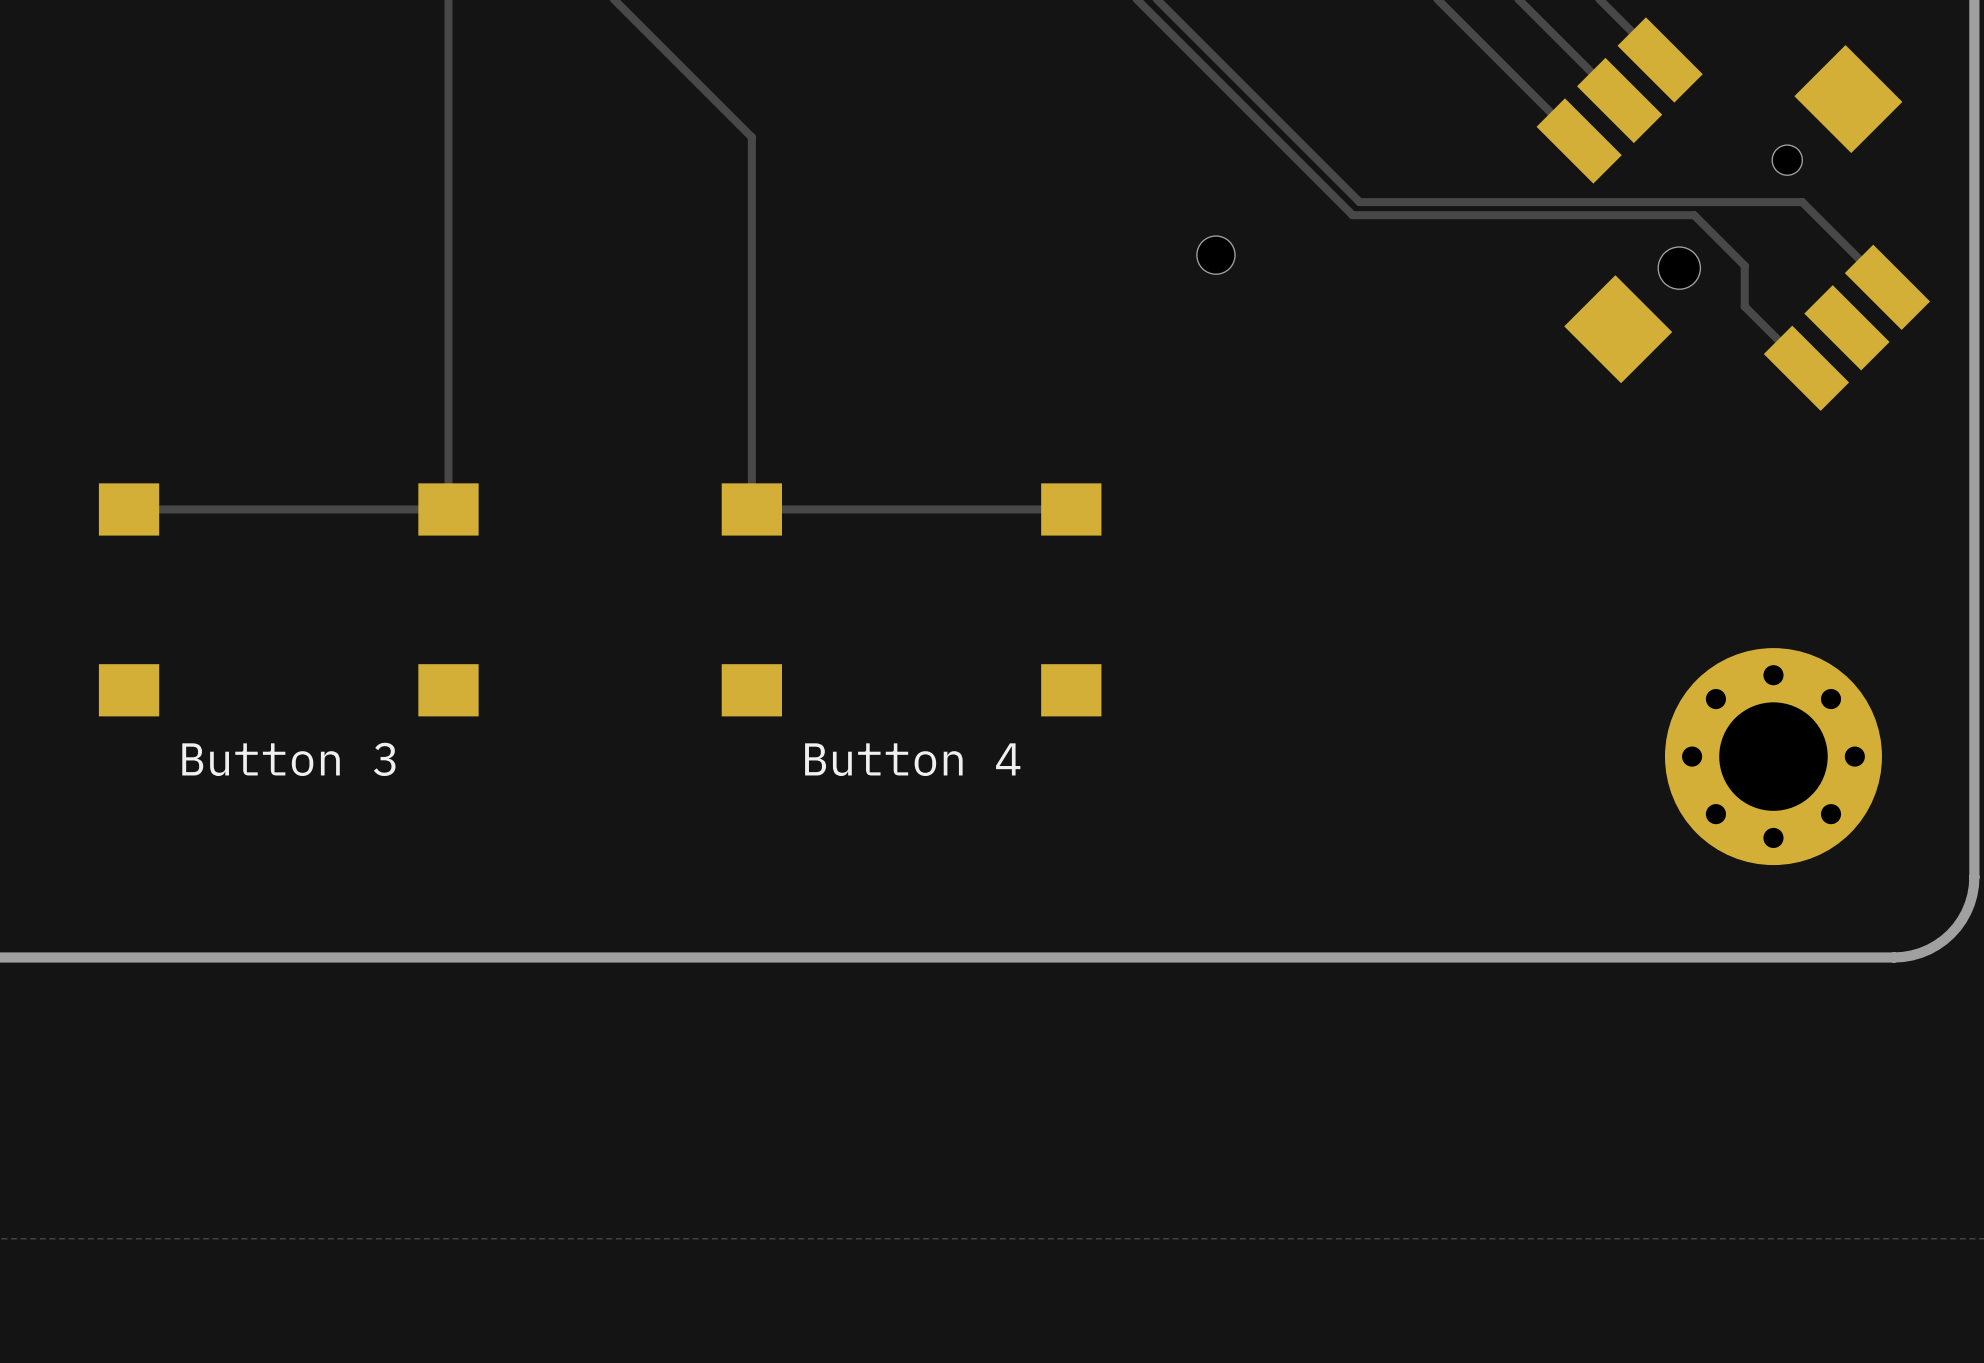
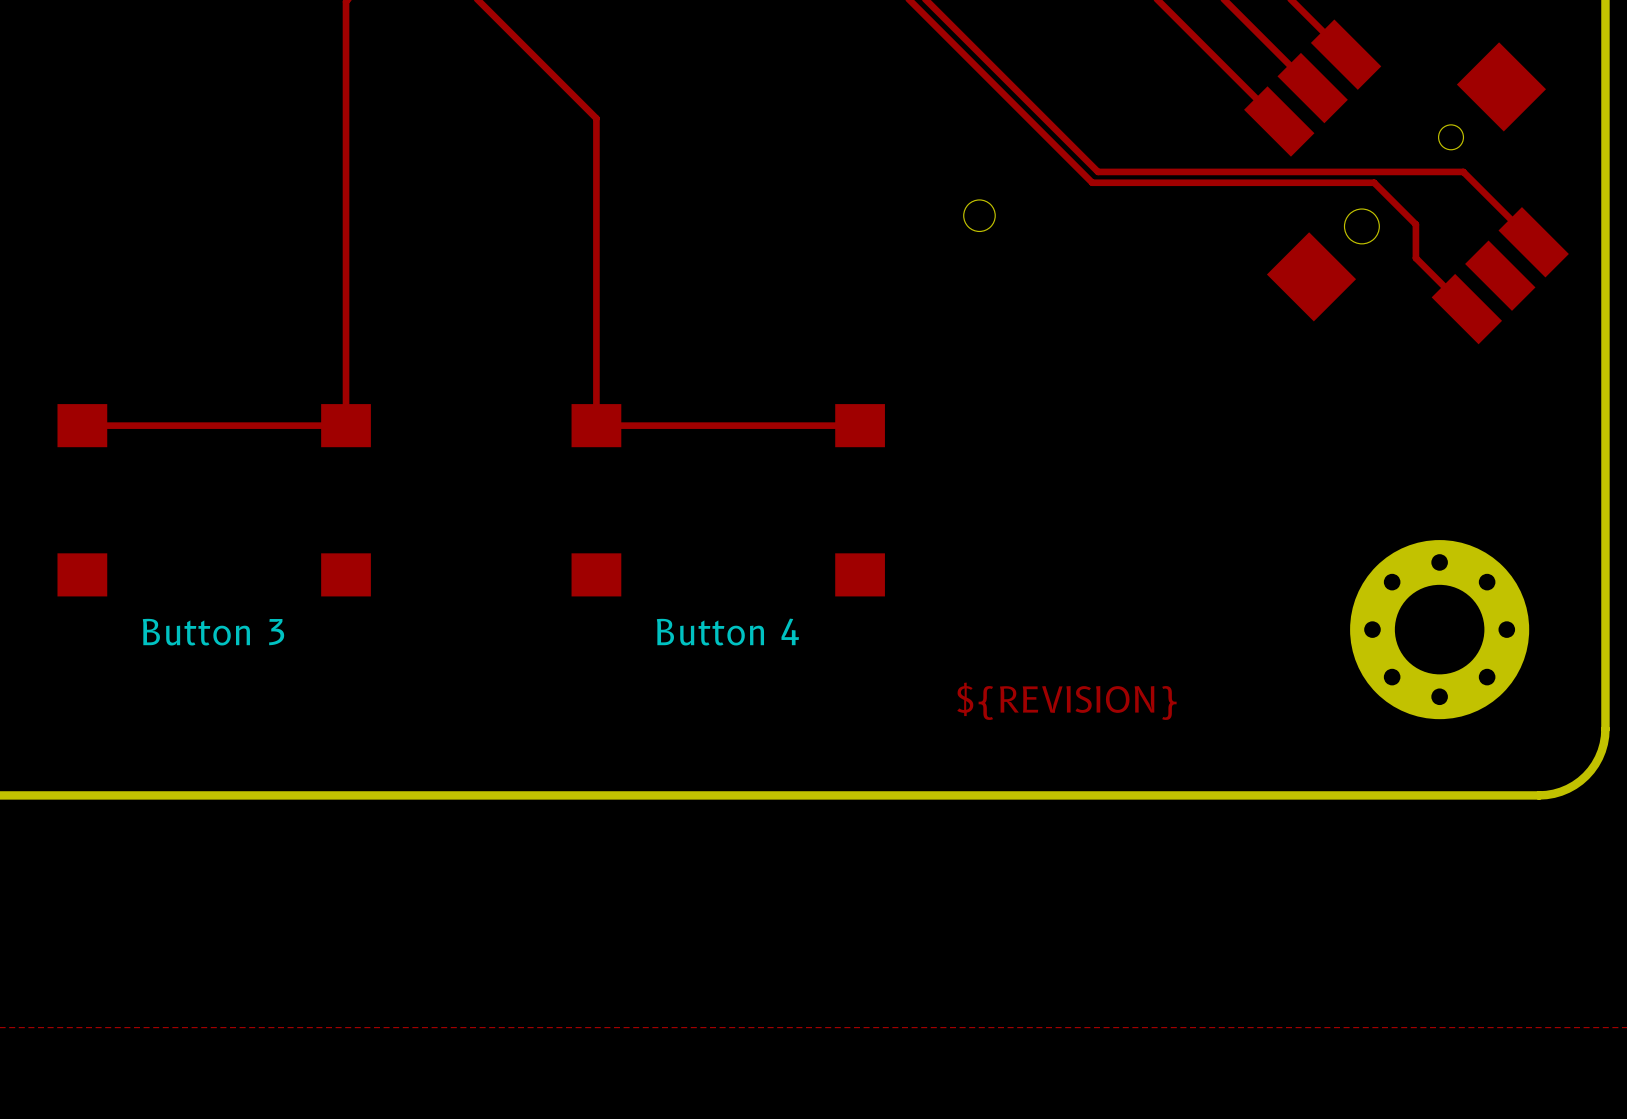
text: none -> ${REVISION} (1066, 701)

